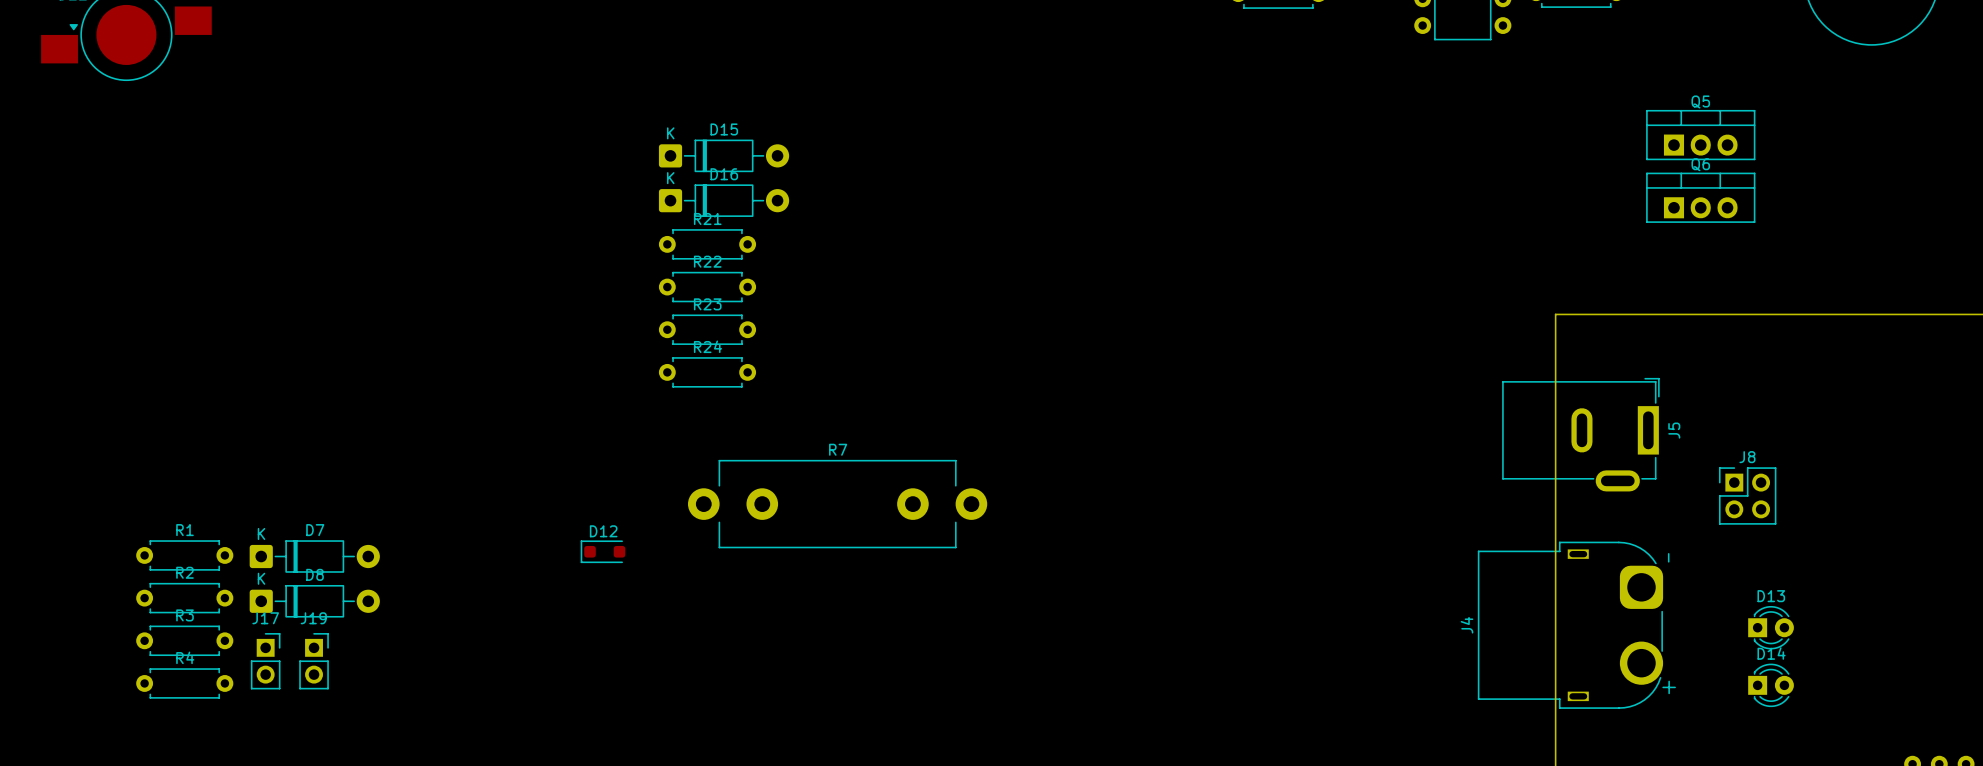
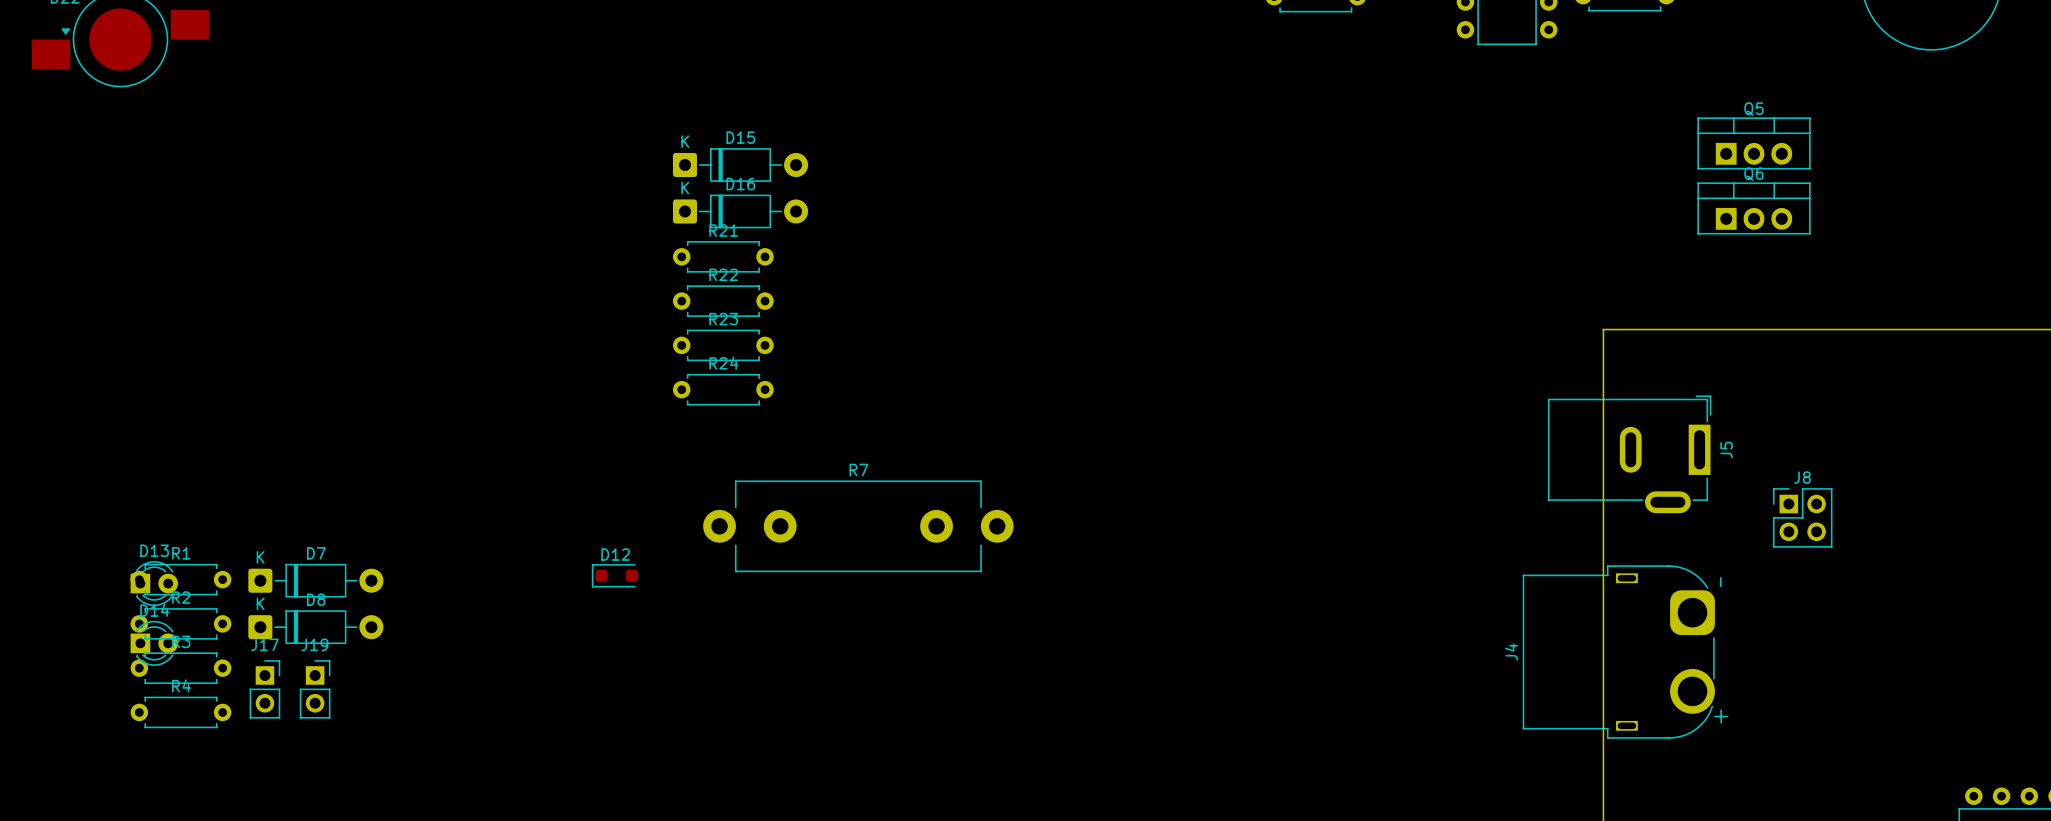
D13 position: (1771, 627) -> (154, 583)
D14 position: (1771, 685) -> (154, 643)

